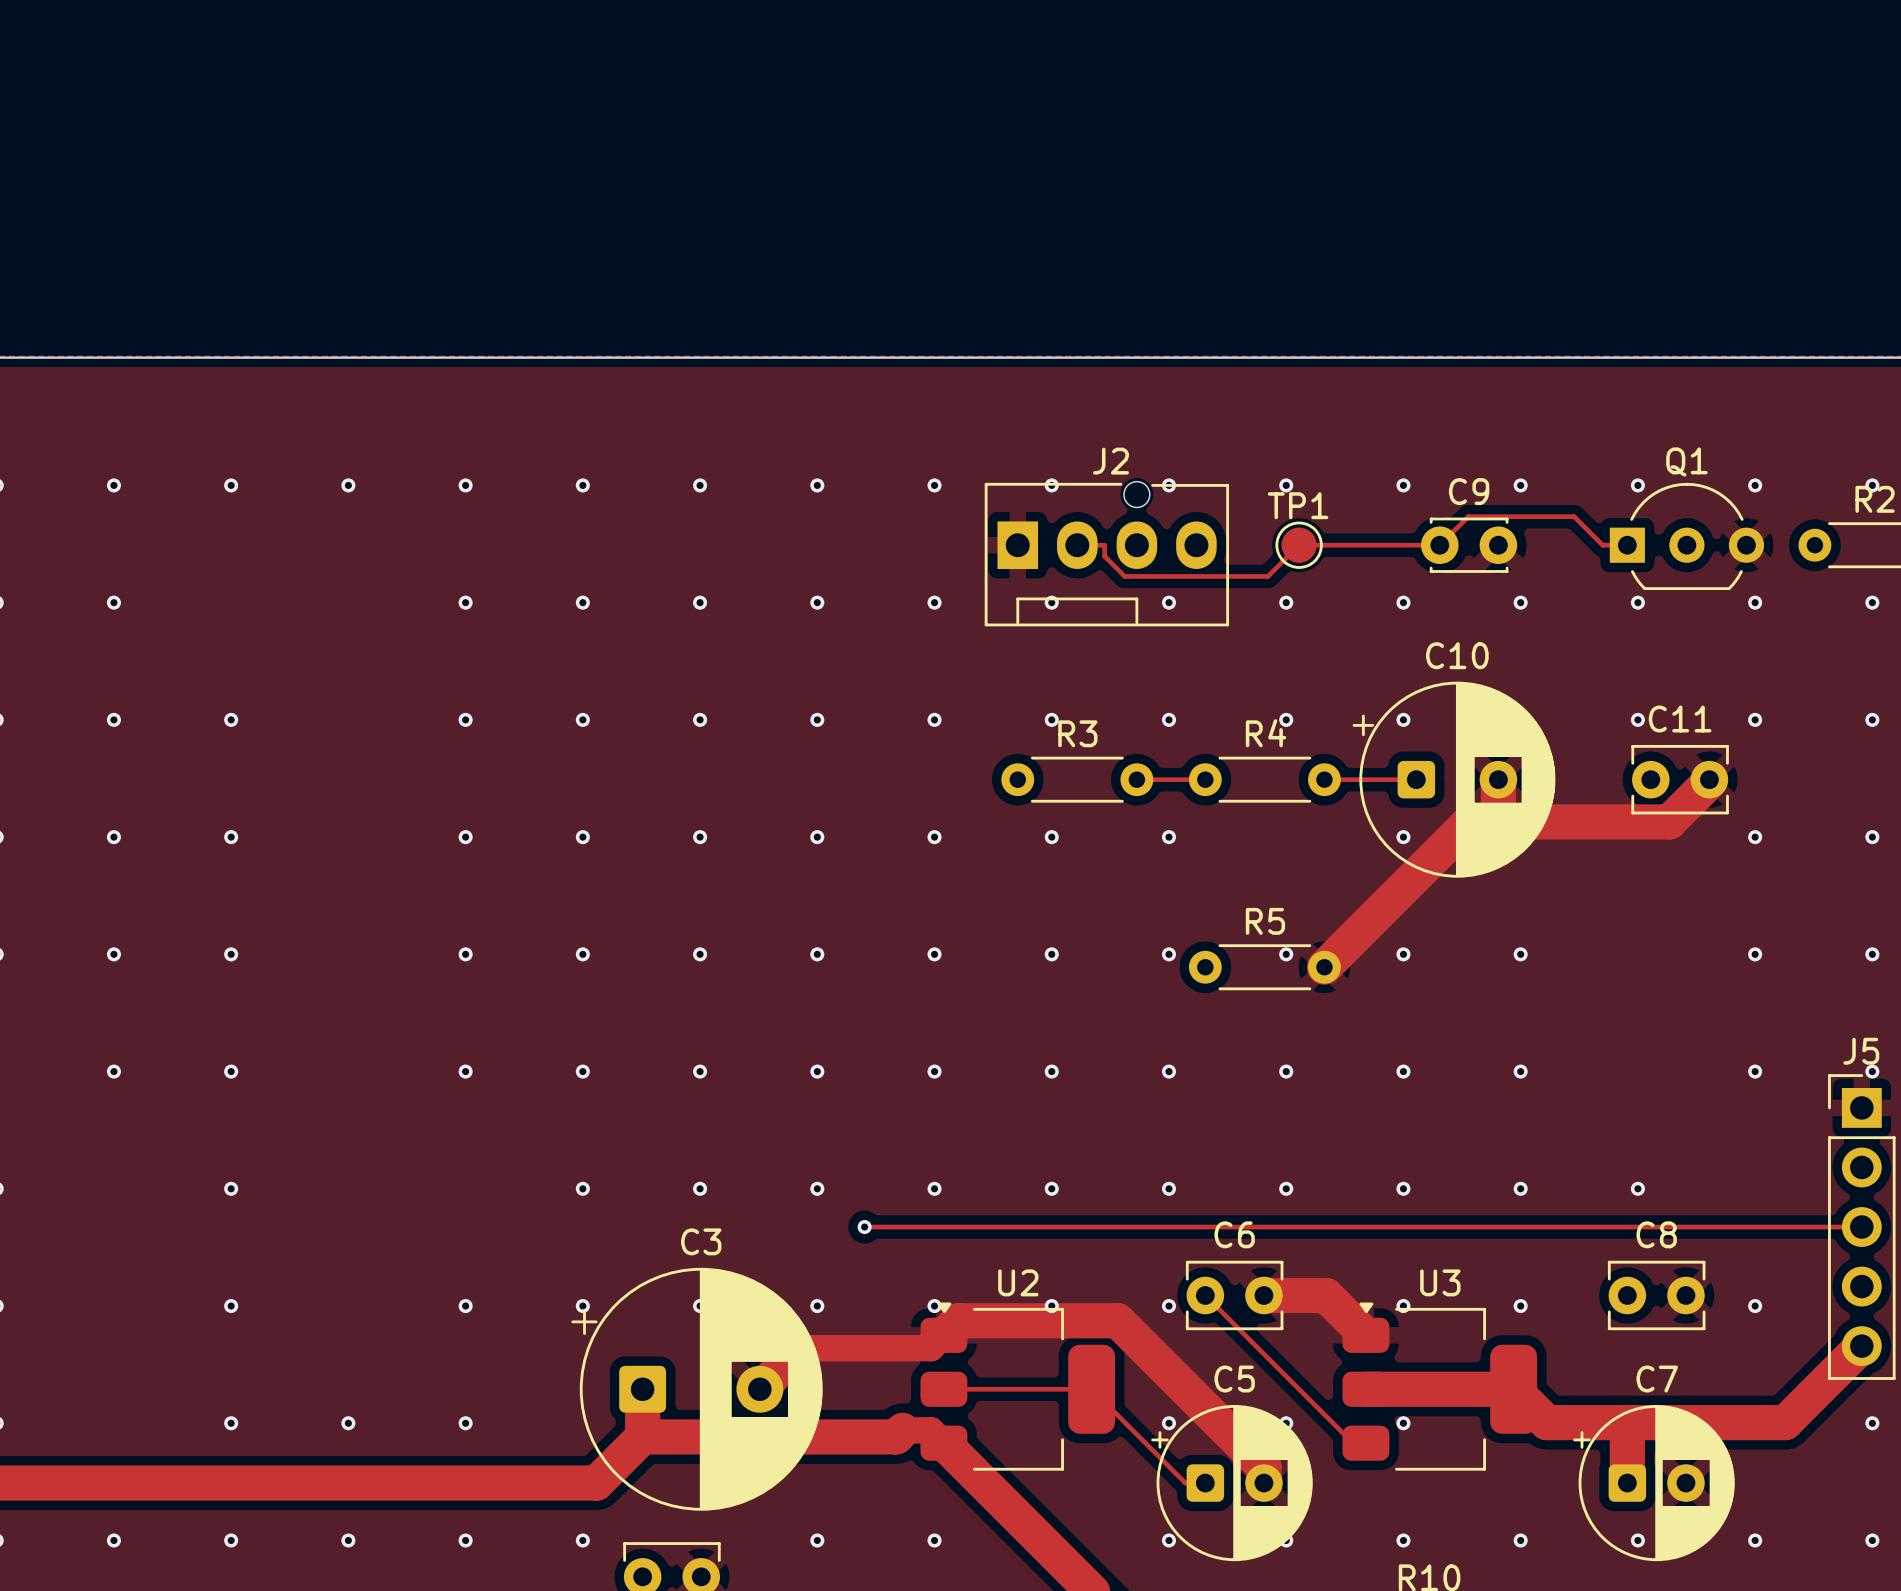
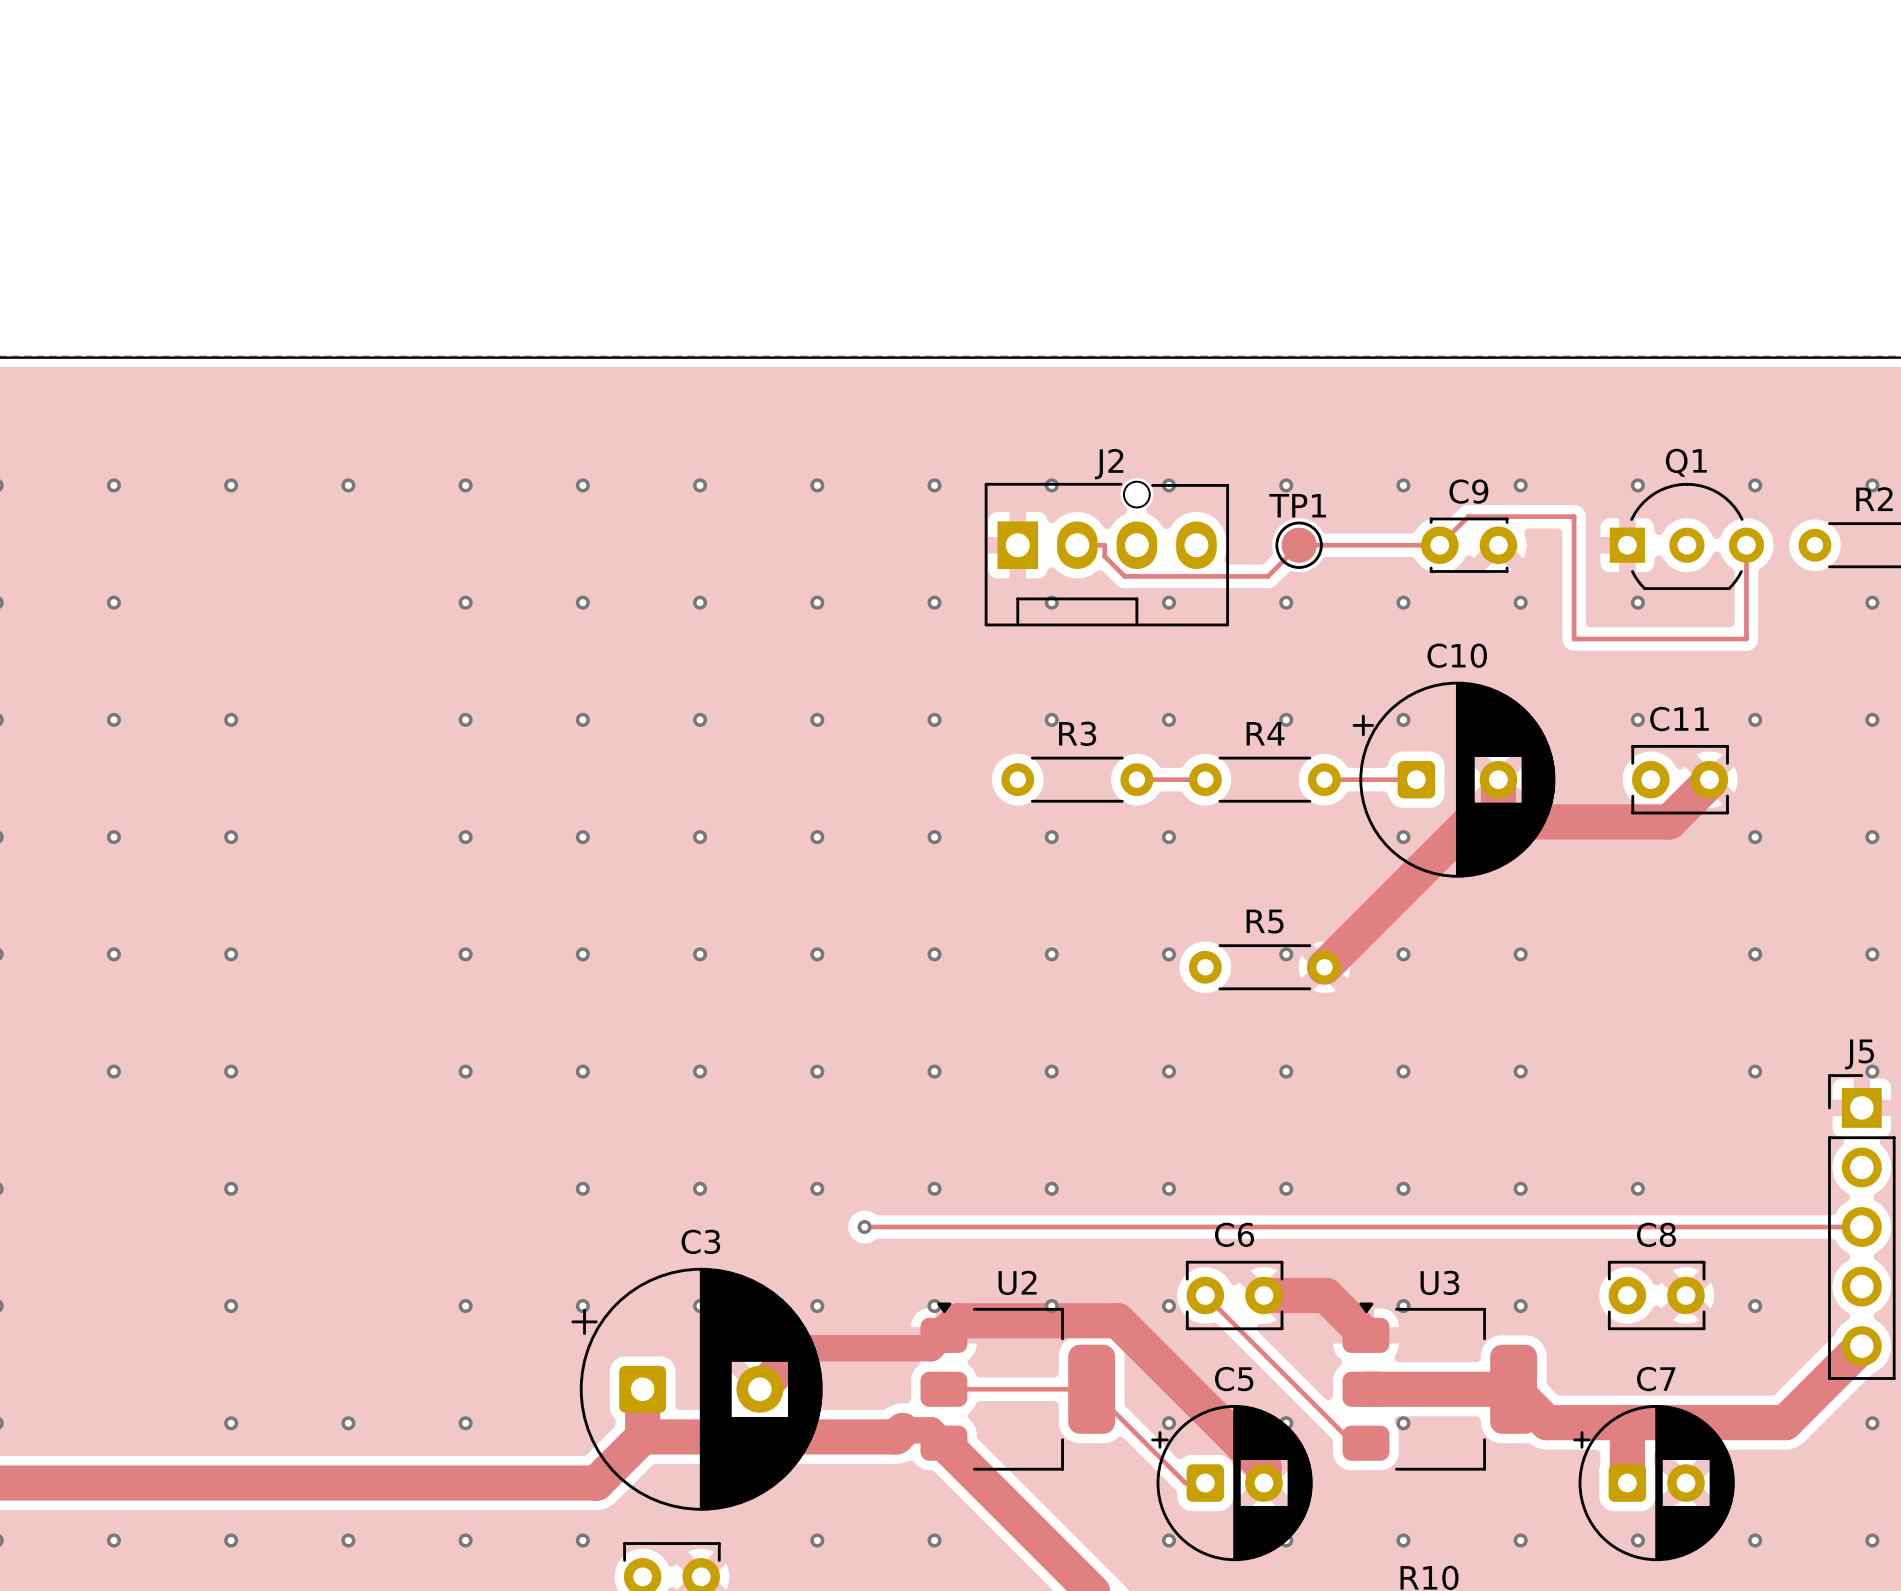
track: (1574, 516) (1602, 545) (1627, 545) -> (1574, 516) (1574, 639) (1746, 639) (1746, 545)
via: (1755, 602) -> none

